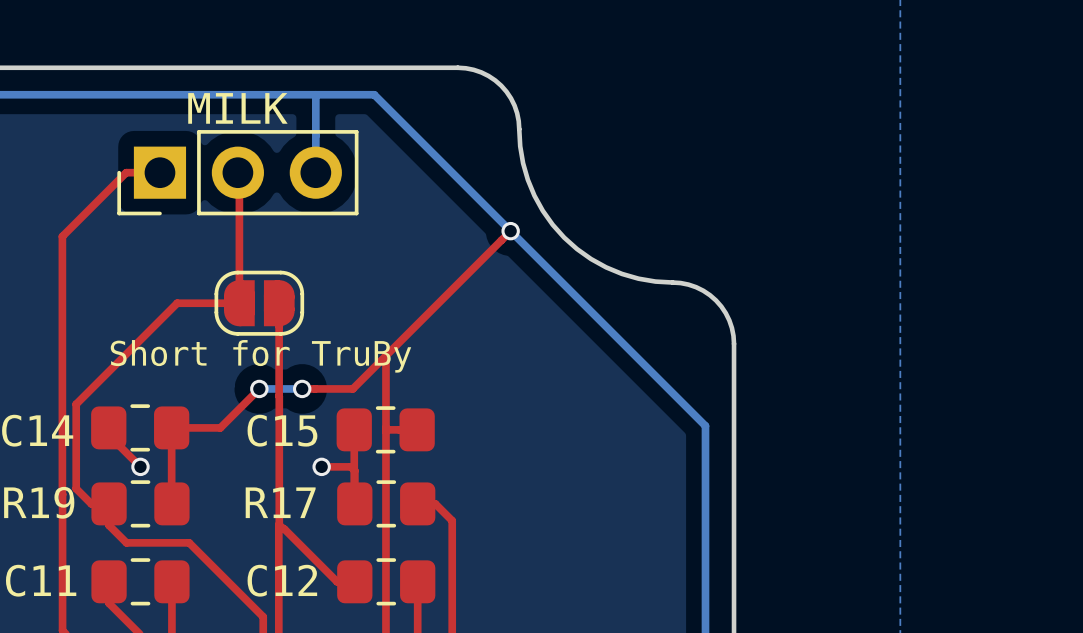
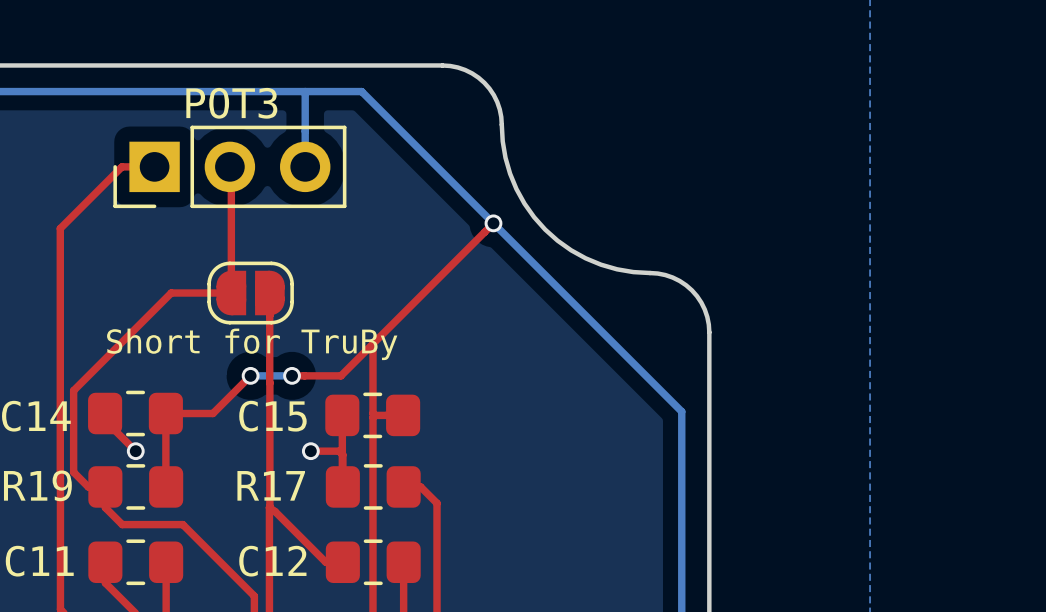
POT3 name: none -> POT3 (231, 103)
text: MILK (237, 108) -> none

